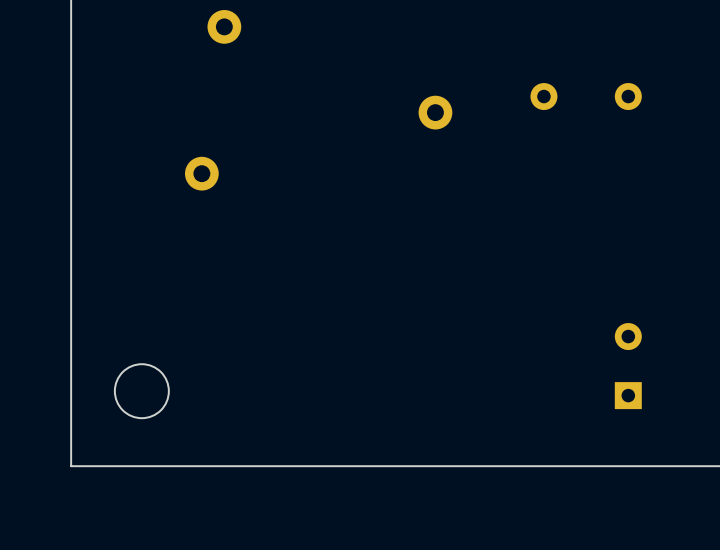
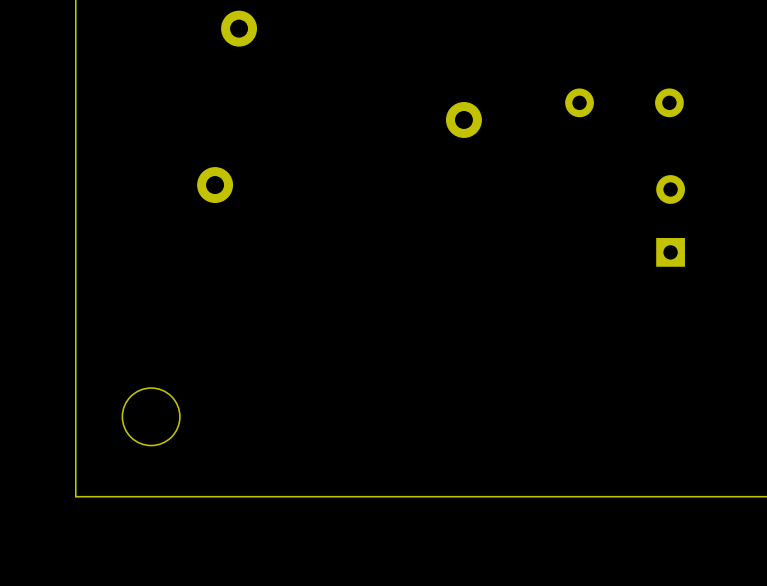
part position: (628, 366) -> (670, 220)

